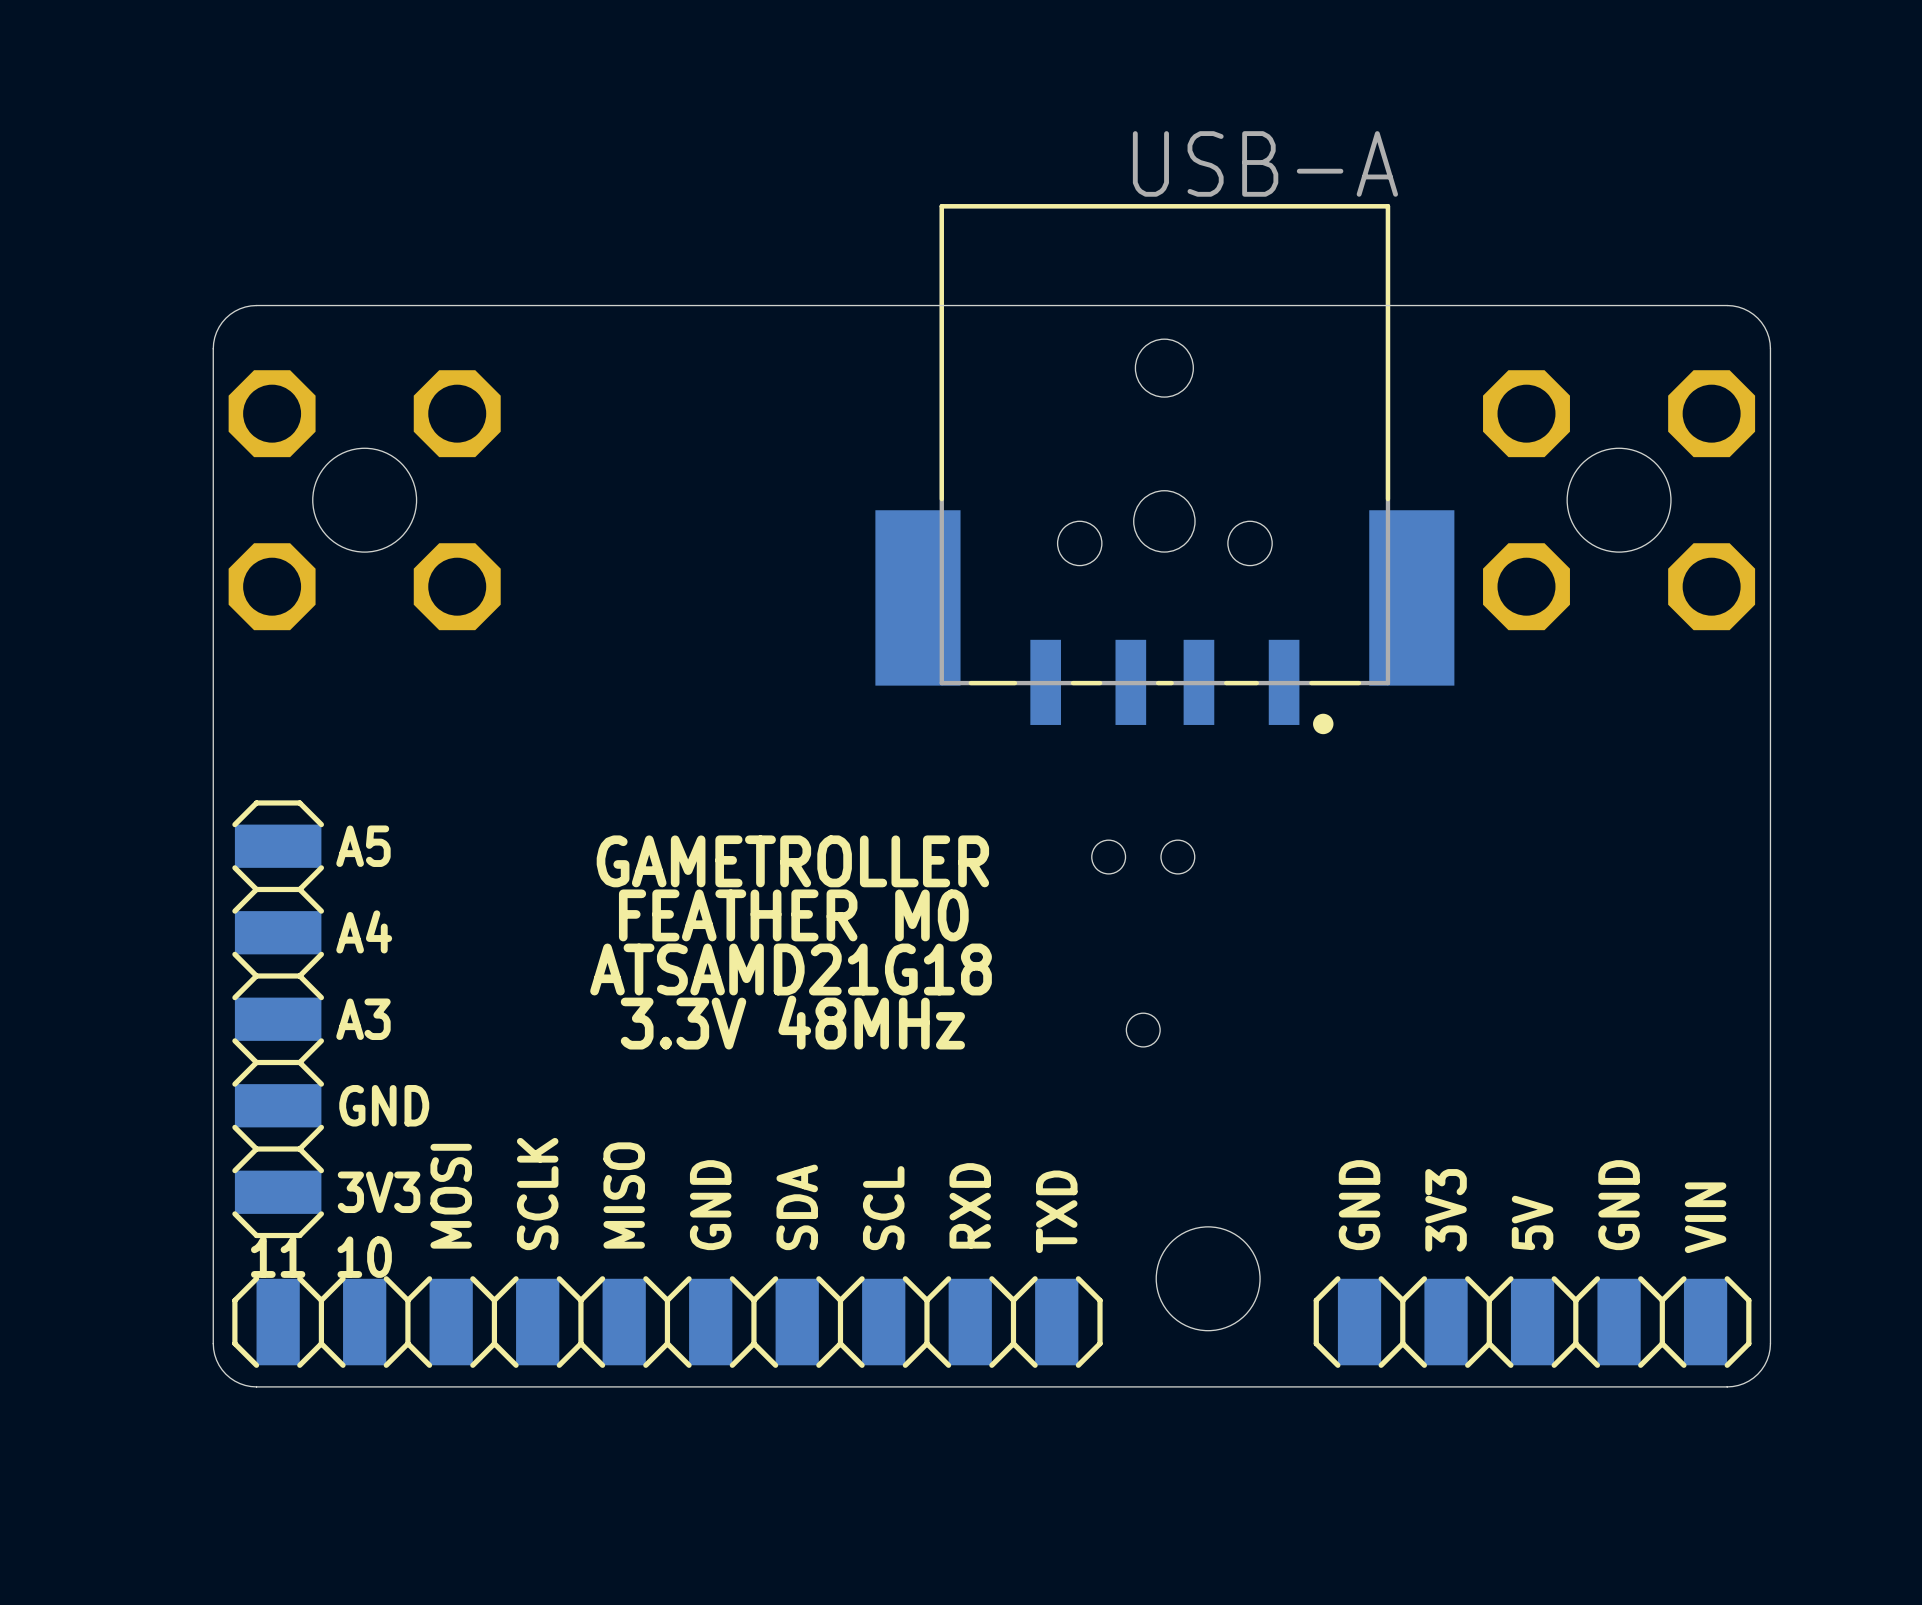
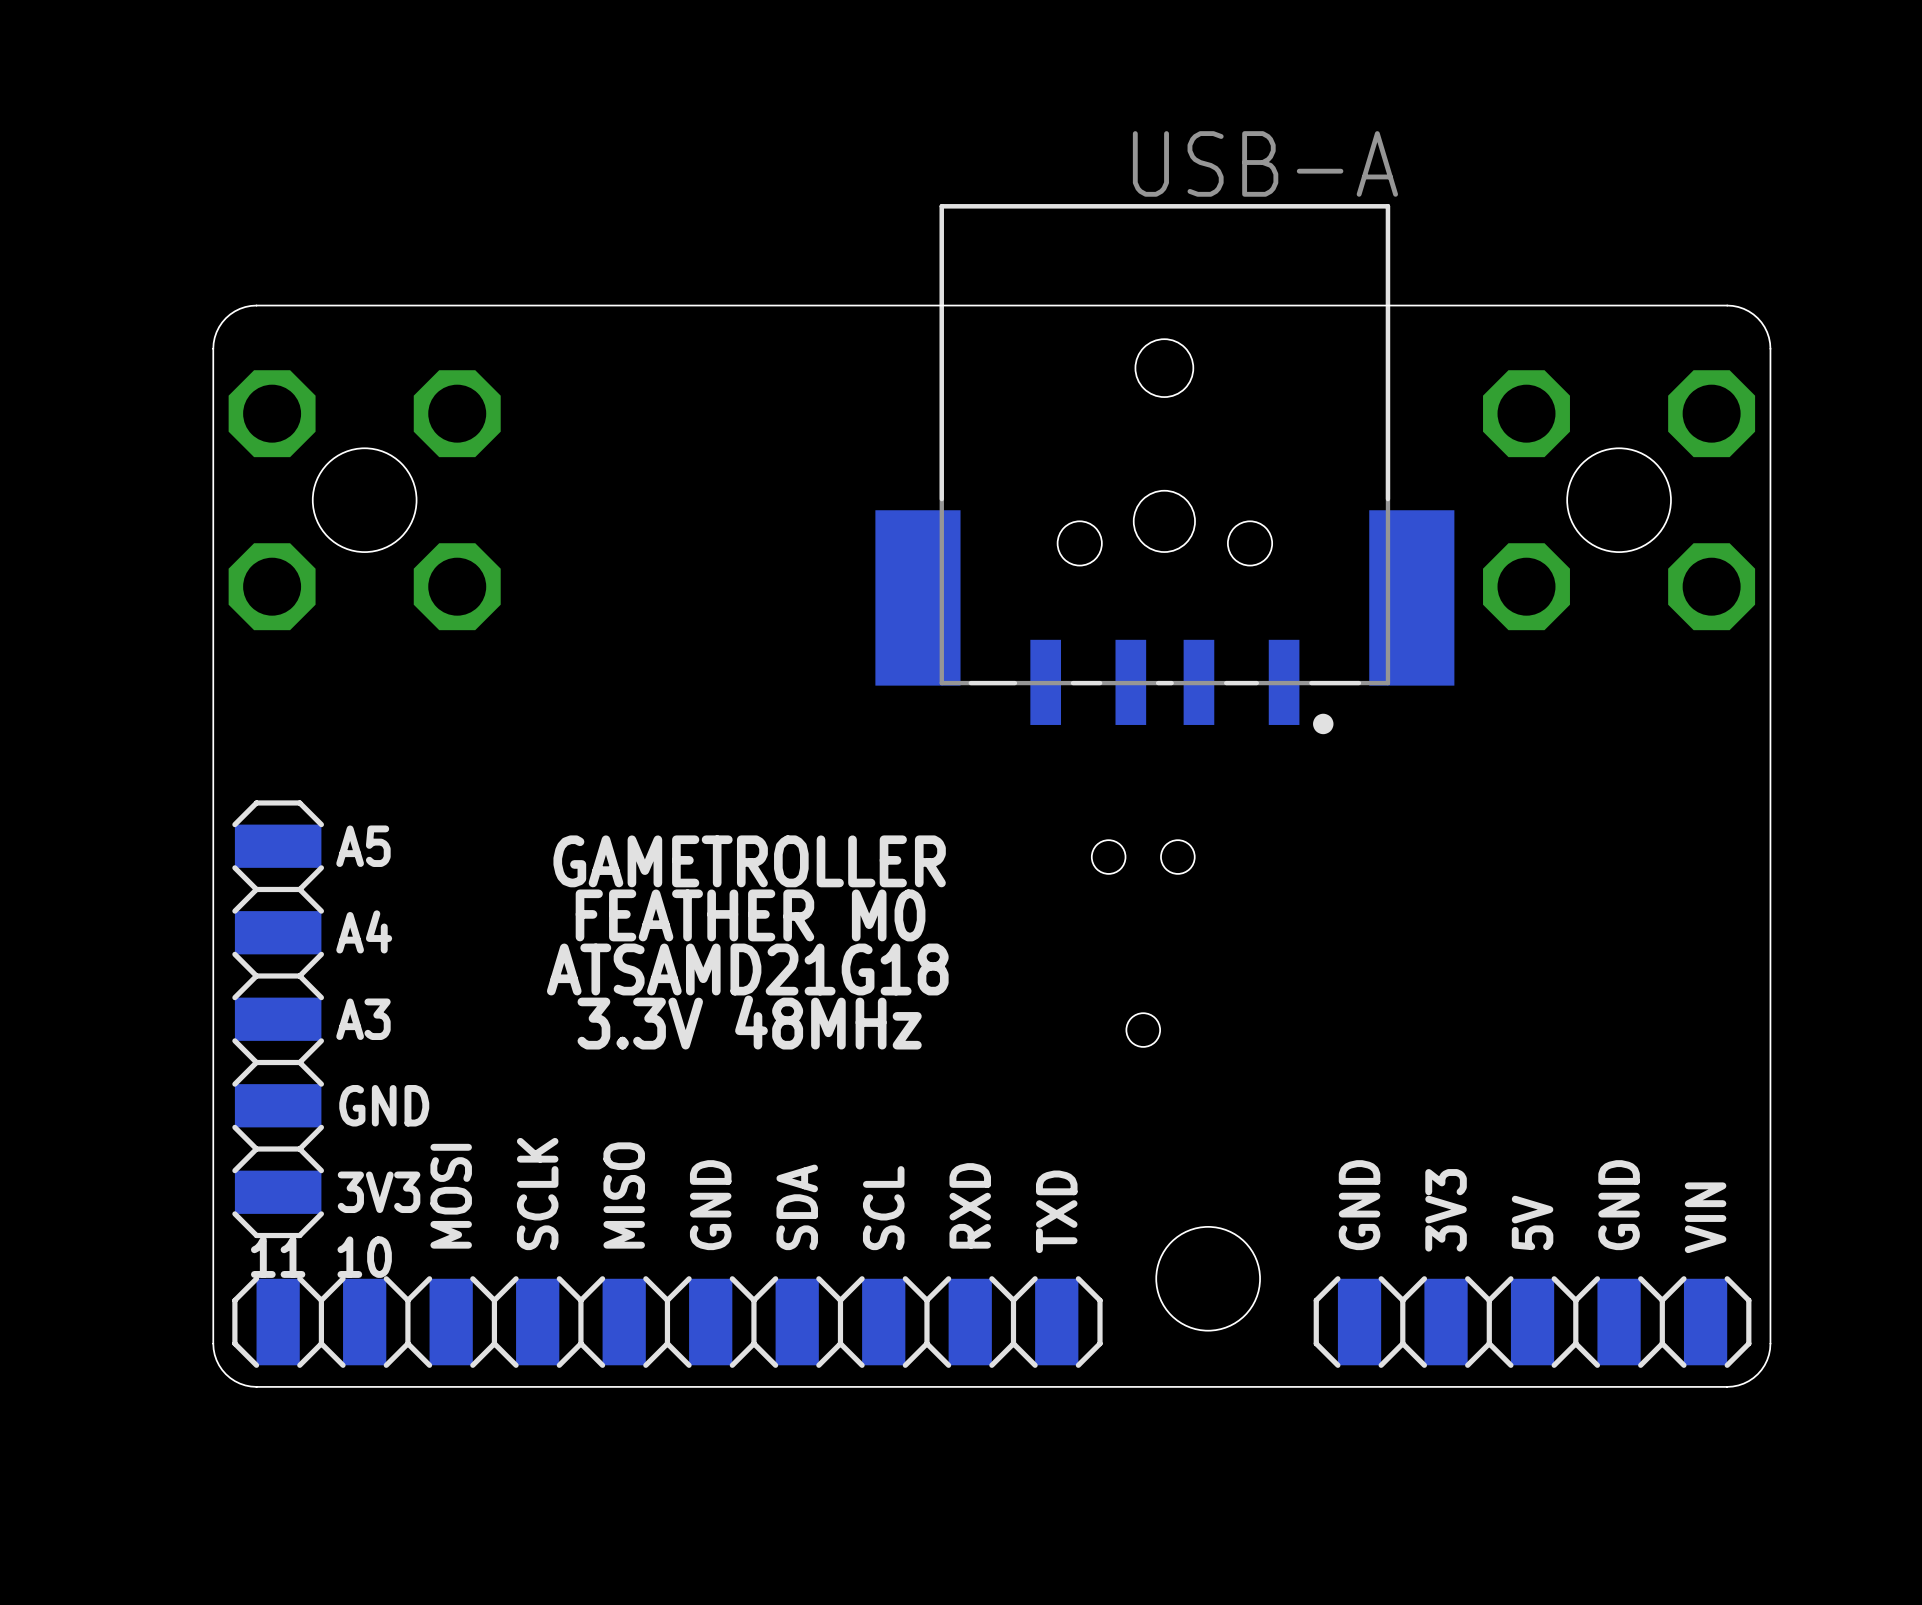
text position: GAMETROLLER (792, 861) -> GAMETROLLER (749, 861)
text position: FEATHER M0 (793, 915) -> FEATHER M0 (750, 915)
text position: ATSAMD21G18 (791, 969) -> ATSAMD21G18 (747, 969)
text position: 3.3V 48MHz (792, 1022) -> 3.3V 48MHz (749, 1022)

